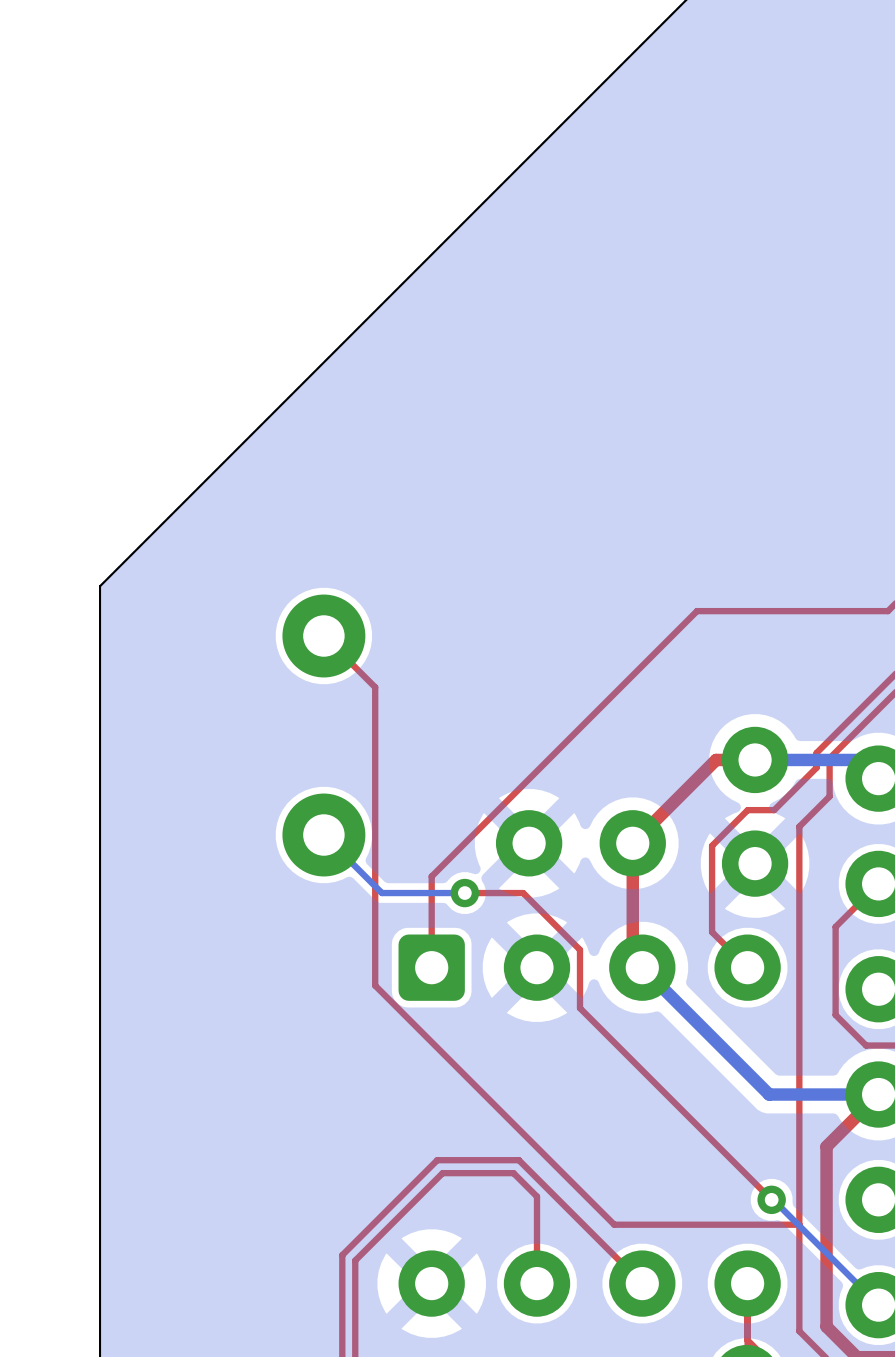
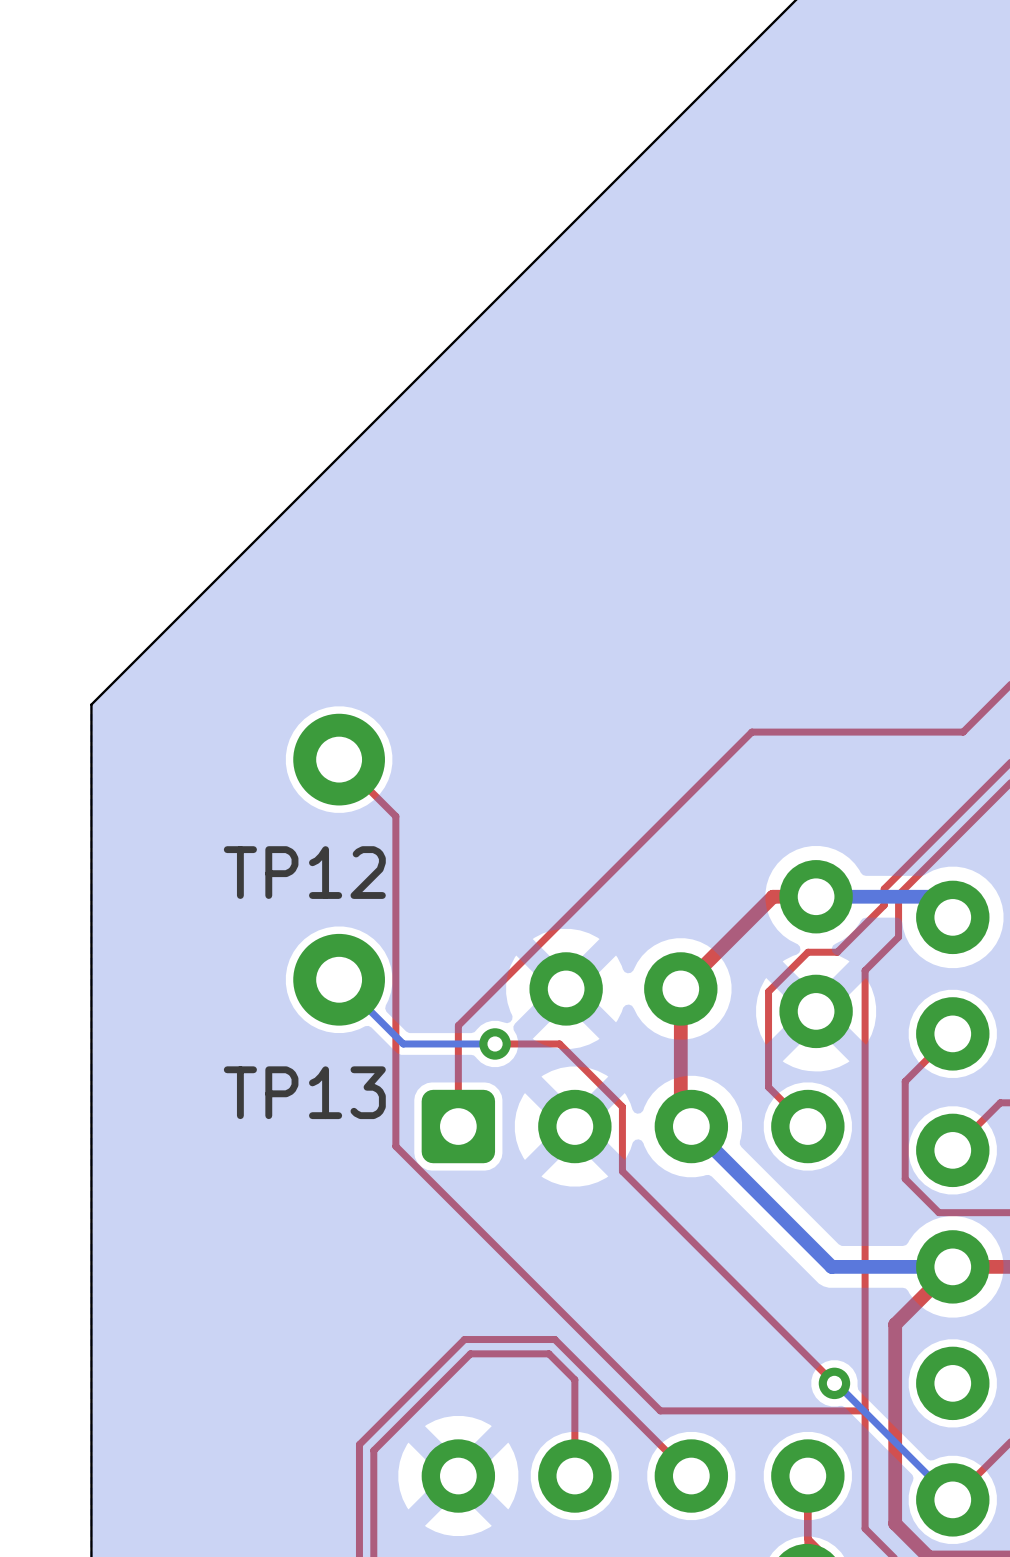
TP12 name: none -> TP12 (304, 872)
TP13 name: none -> TP13 (304, 1092)

